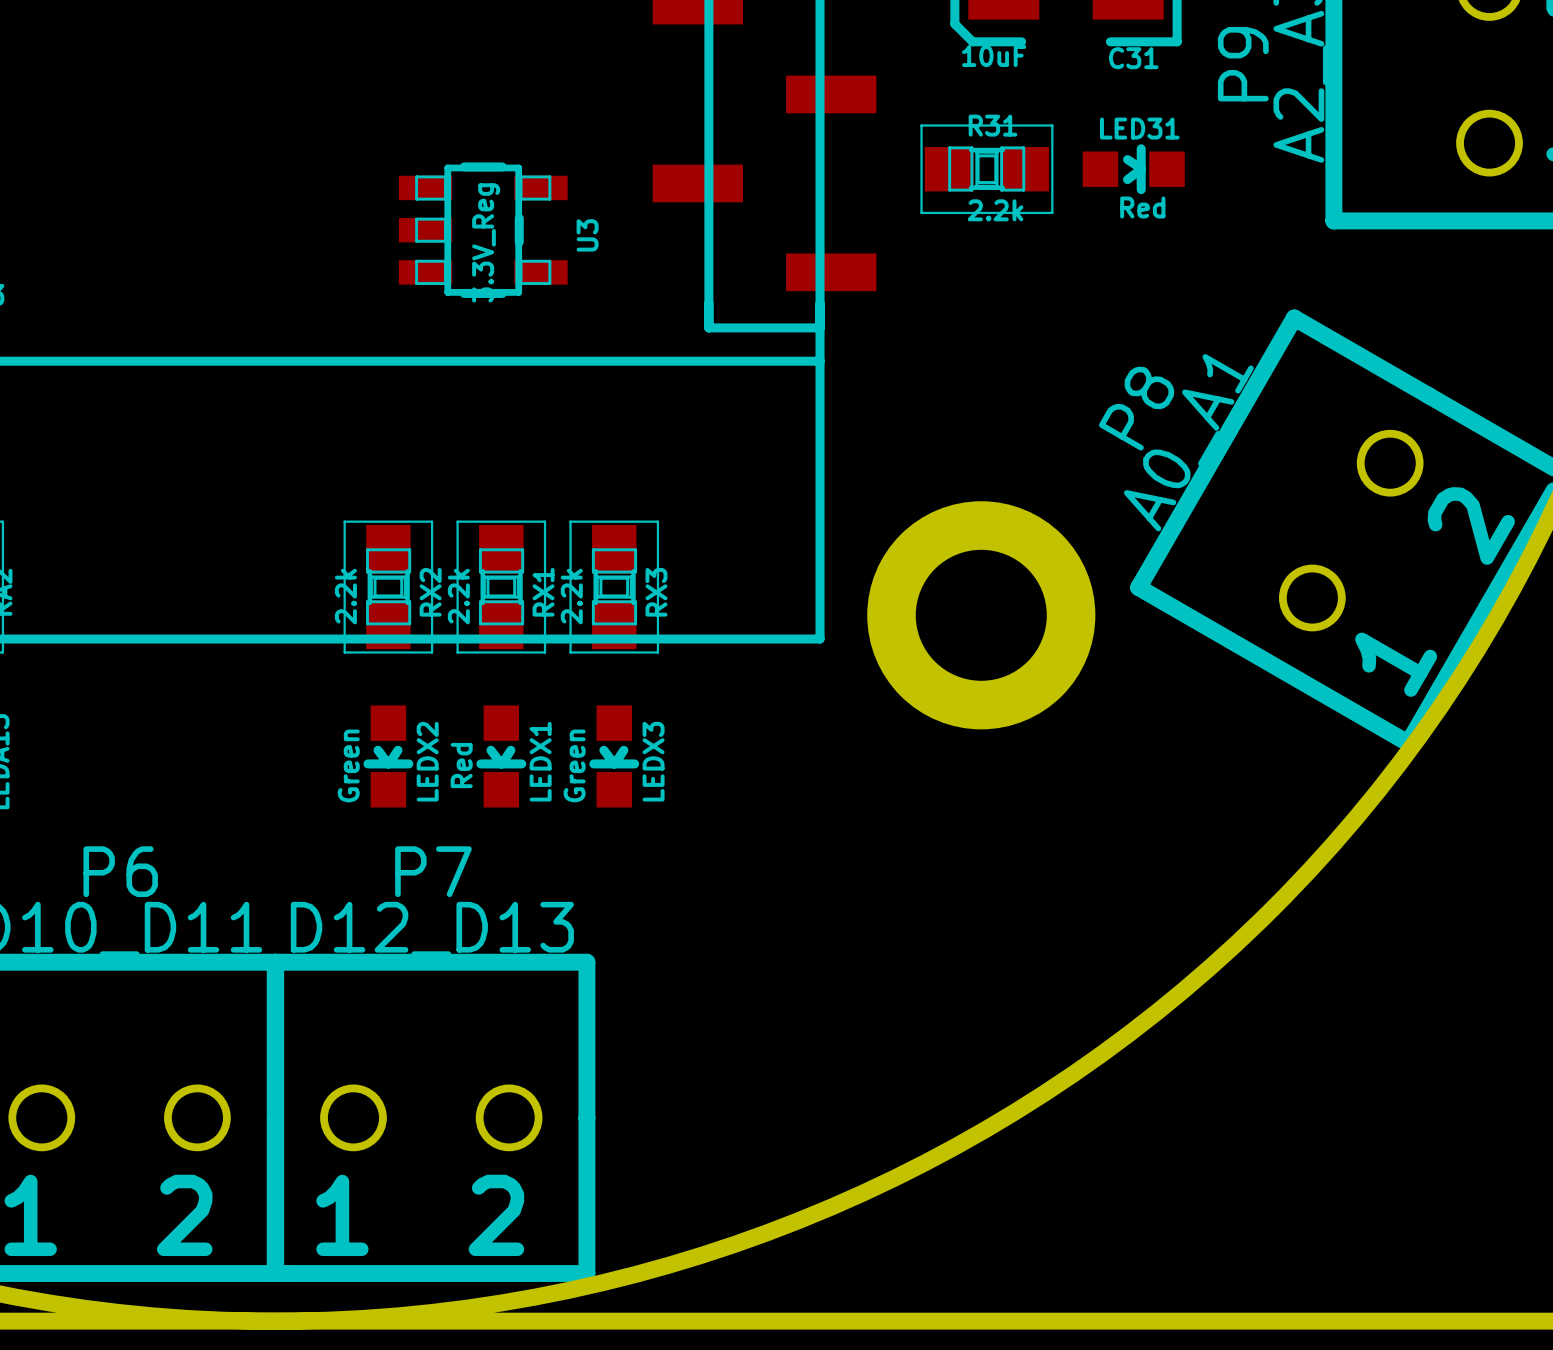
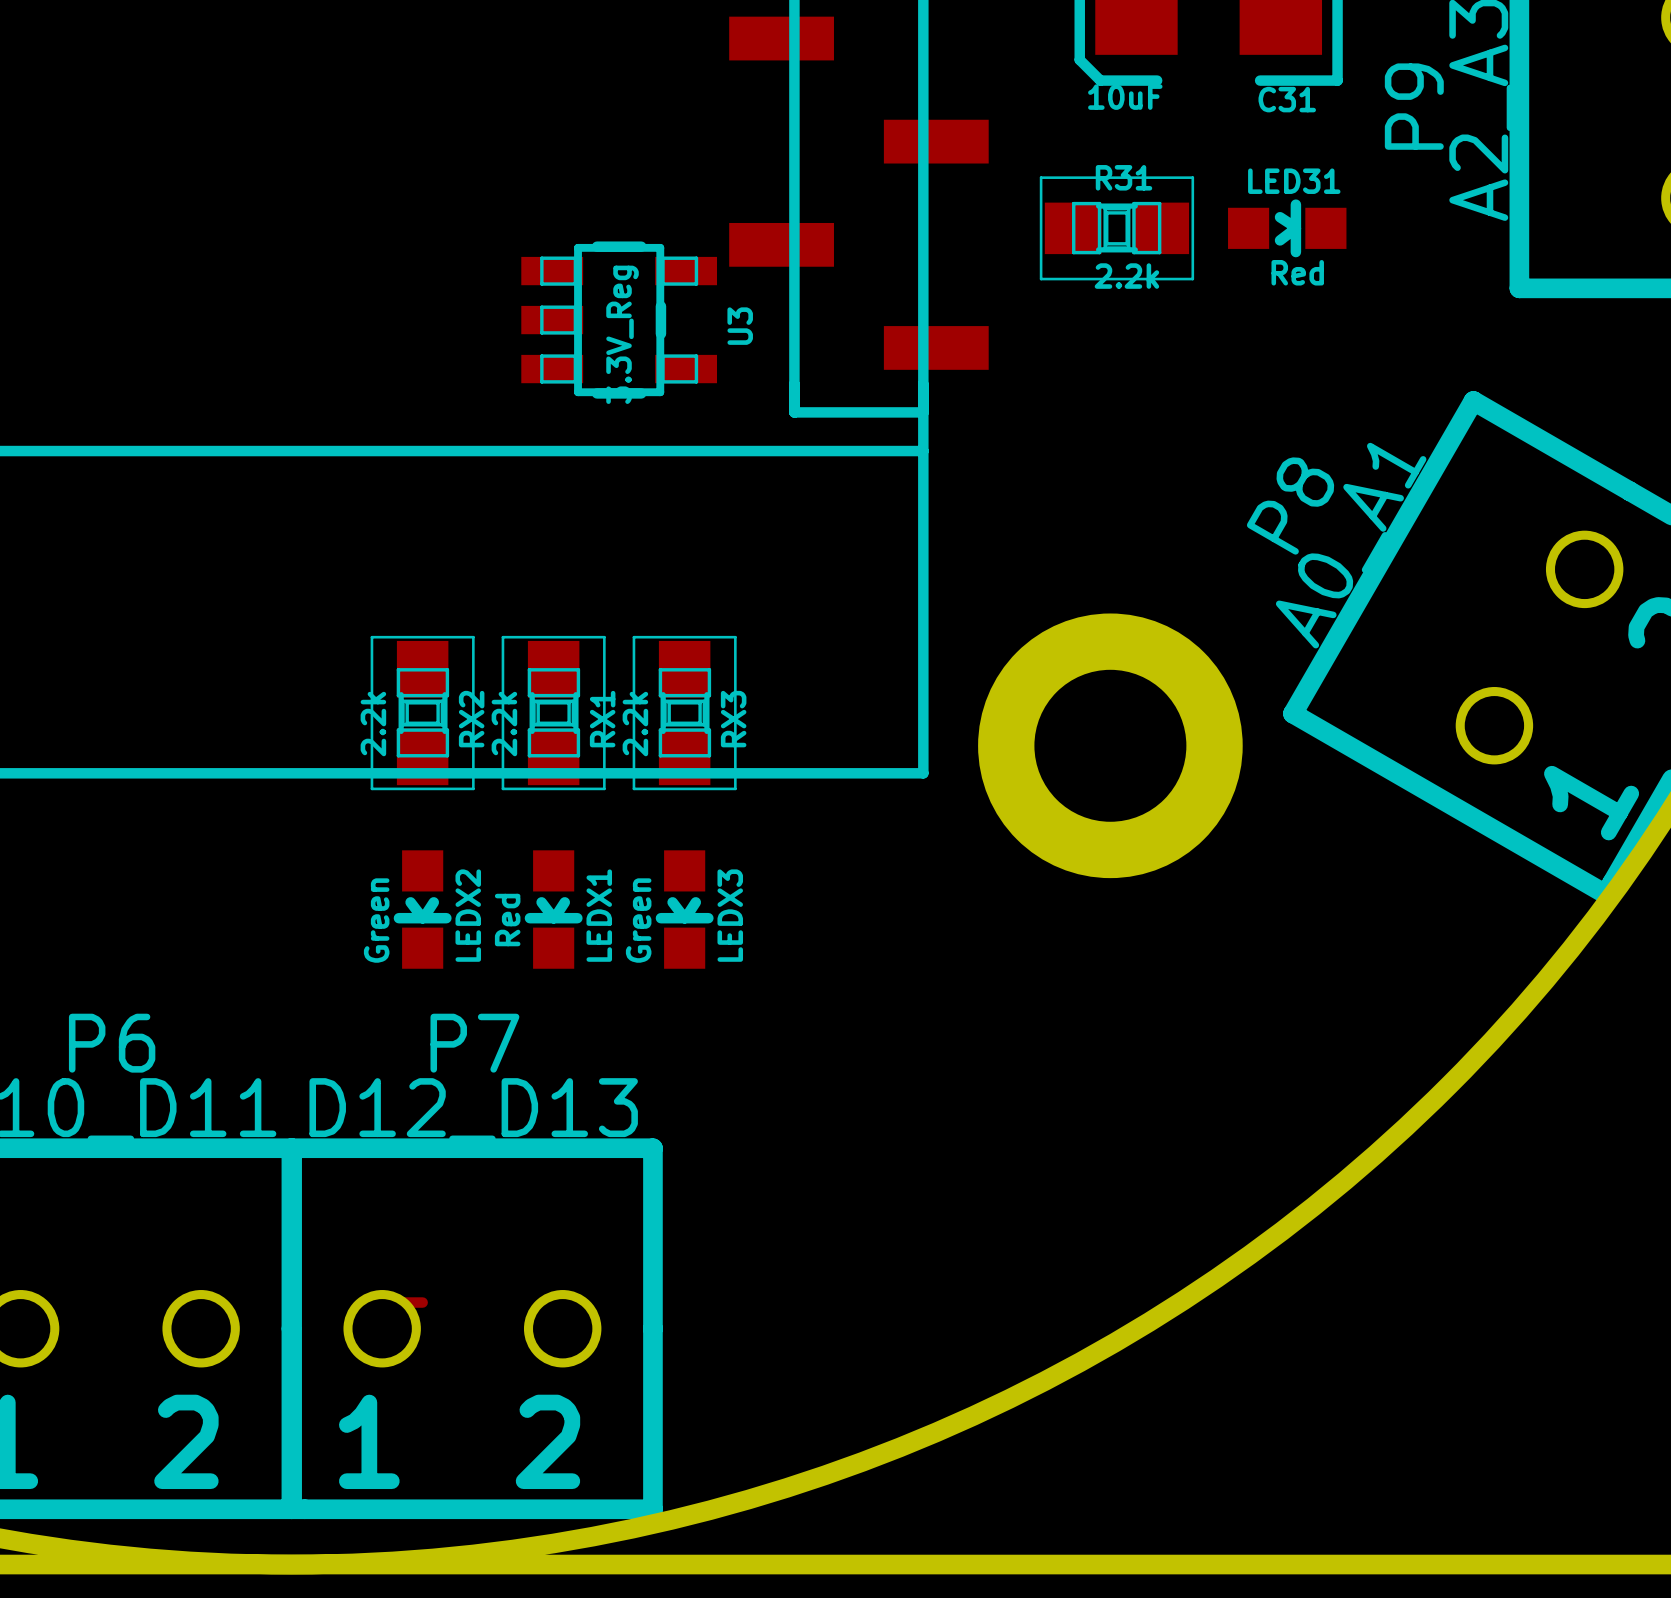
U3 position: (483, 230) -> (619, 320)
track: none -> (397, 1302) (422, 1302)

